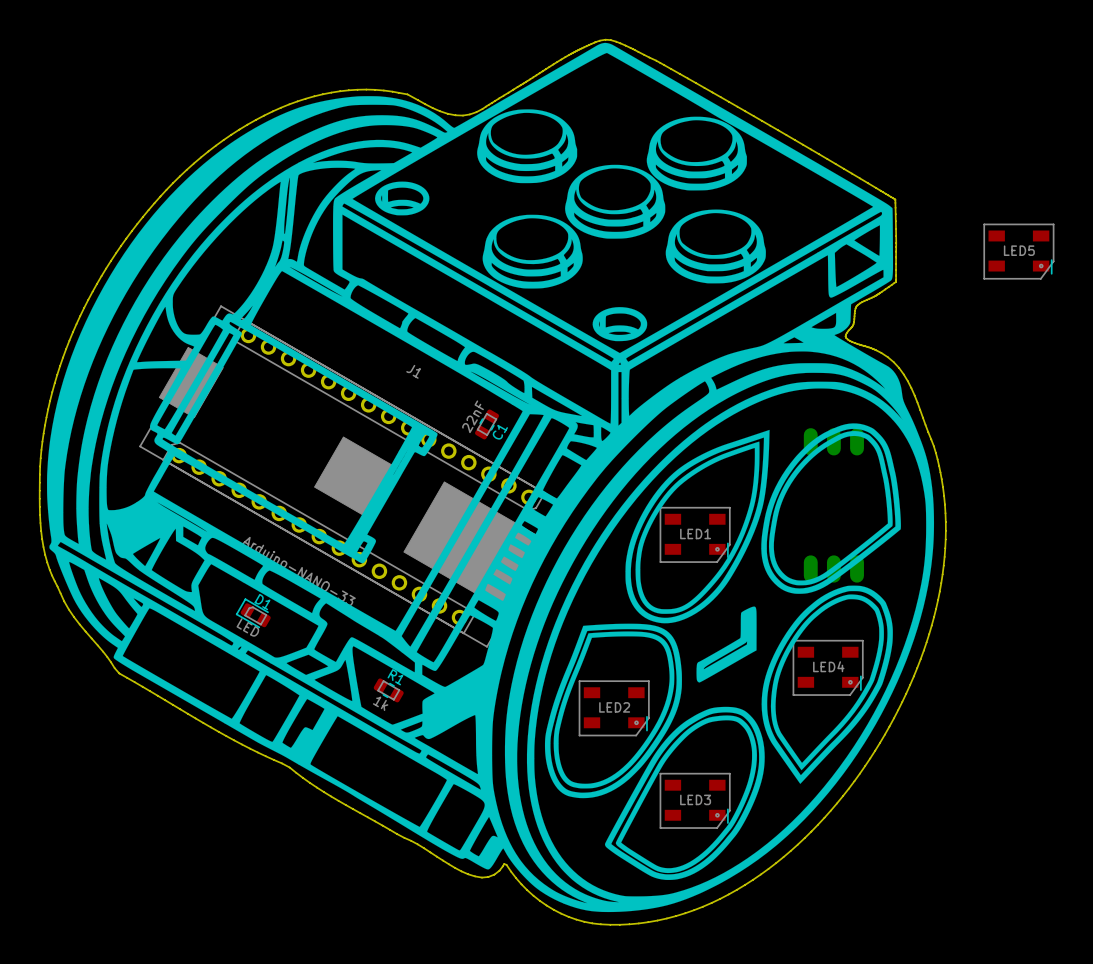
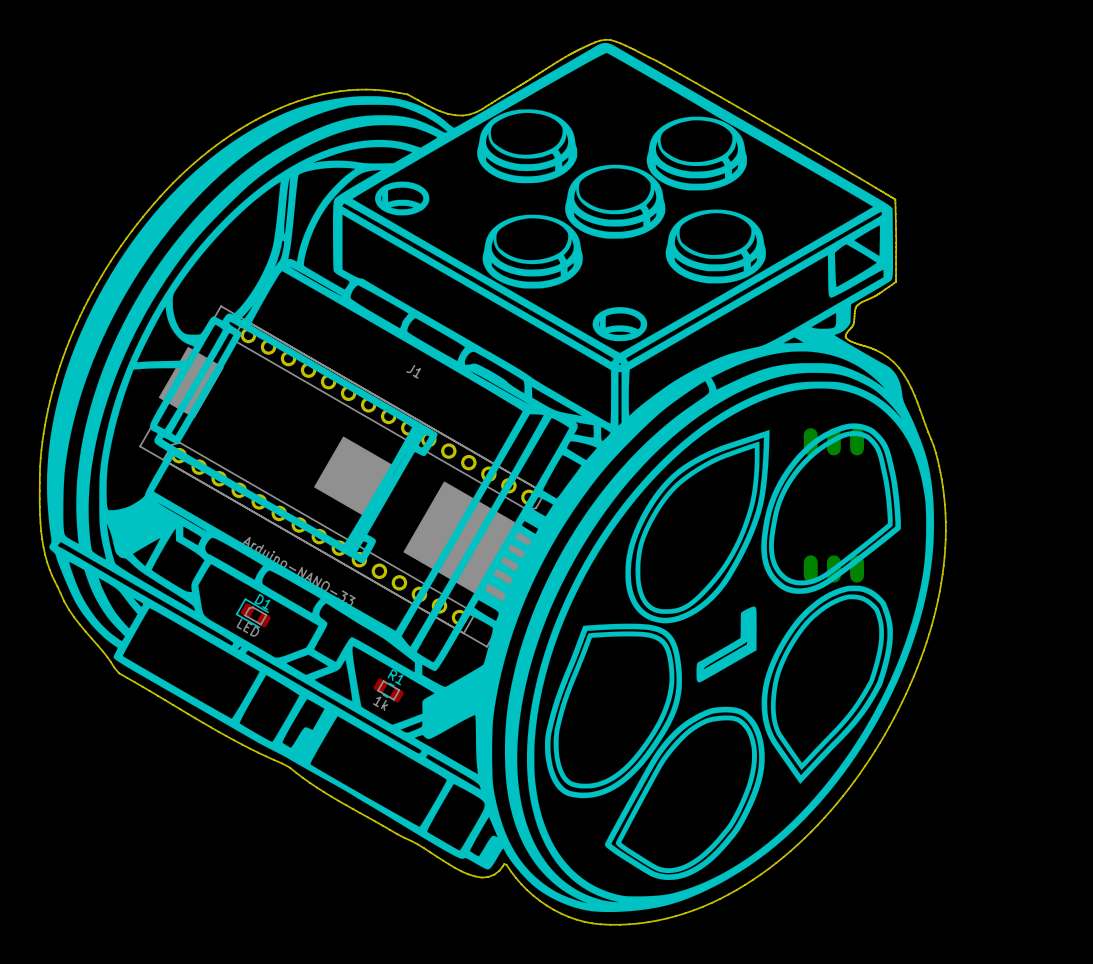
LED5: (1018, 251) -> none
C1: 22nF (487, 424) -> none
LED1: (695, 534) -> none
LED4: (828, 667) -> none
LED2: (614, 708) -> none
LED3: (695, 800) -> none

